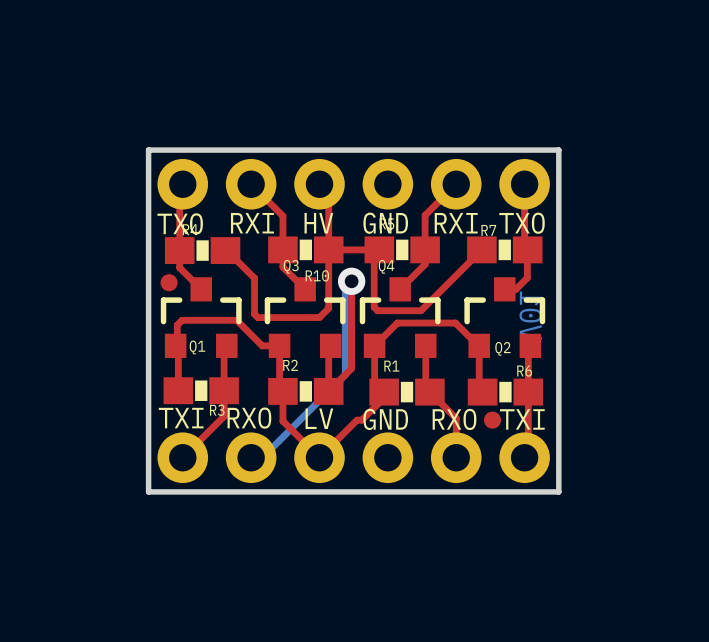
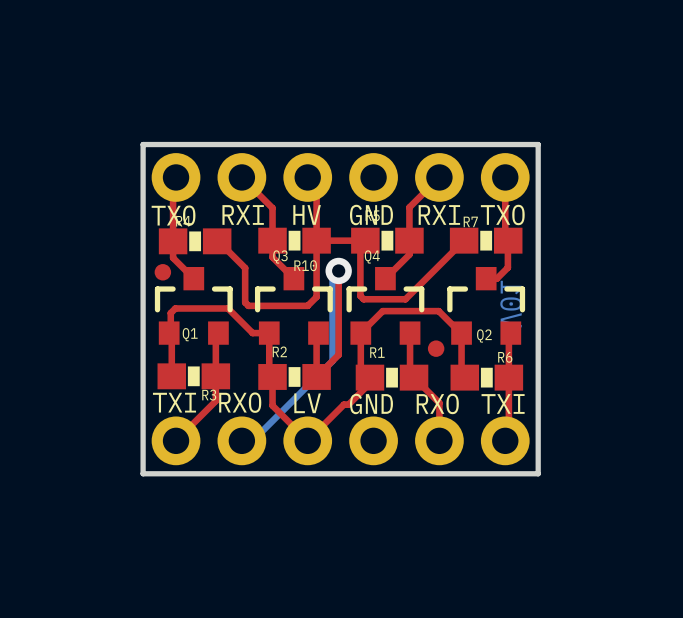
part position: (492, 420) -> (436, 348)

